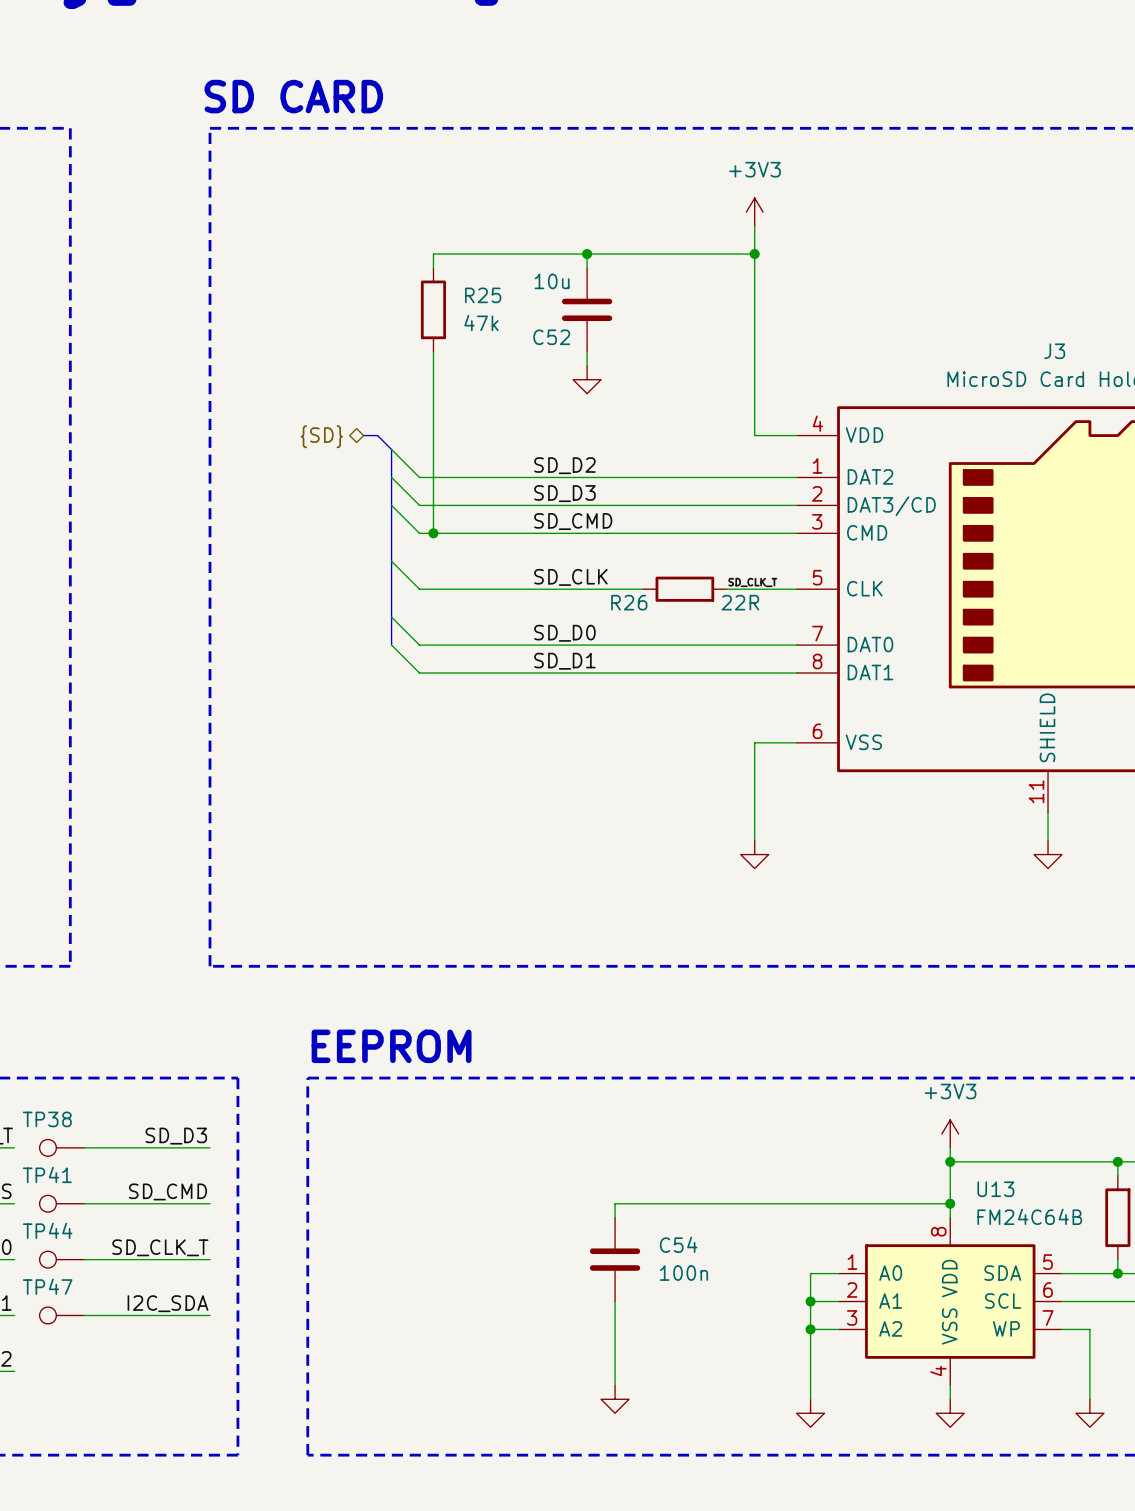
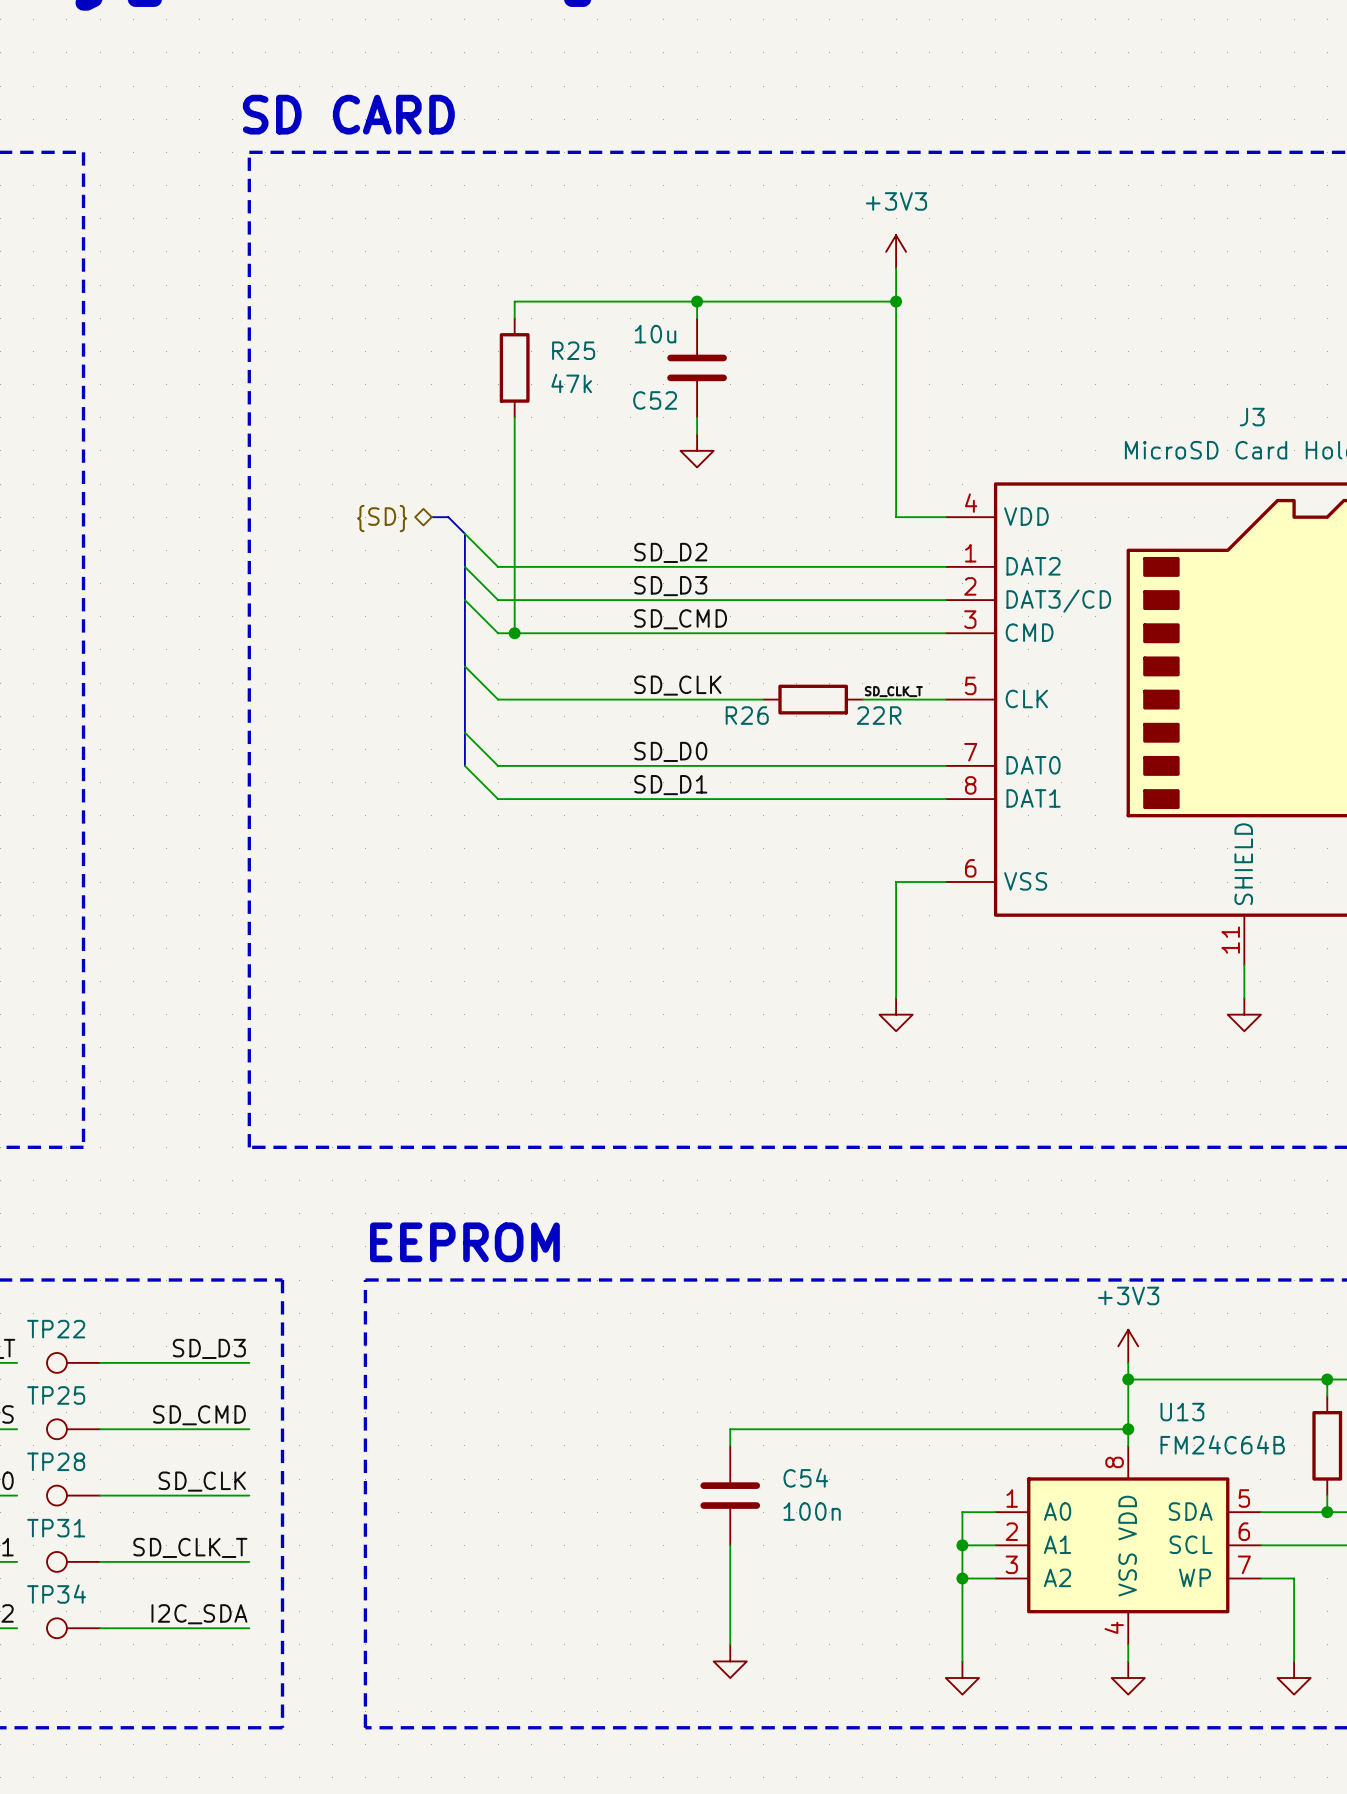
TP38 name: TP38 (47, 1119) -> TP22 (56, 1329)
TP41 name: TP41 (47, 1174) -> TP25 (56, 1395)
TP44 name: TP44 (47, 1230) -> TP28 (56, 1461)
label: SD_CLK_T (160, 1247) -> SD_CLK (202, 1481)
TP47 name: TP47 (47, 1286) -> TP31 (56, 1528)
label: I2C_SDA (167, 1303) -> SD_CLK_T (190, 1547)
label: none -> I2C_SDA (199, 1614)
TP34: none -> (73, 1628)
wire: none -> (100, 1628) (249, 1628)

